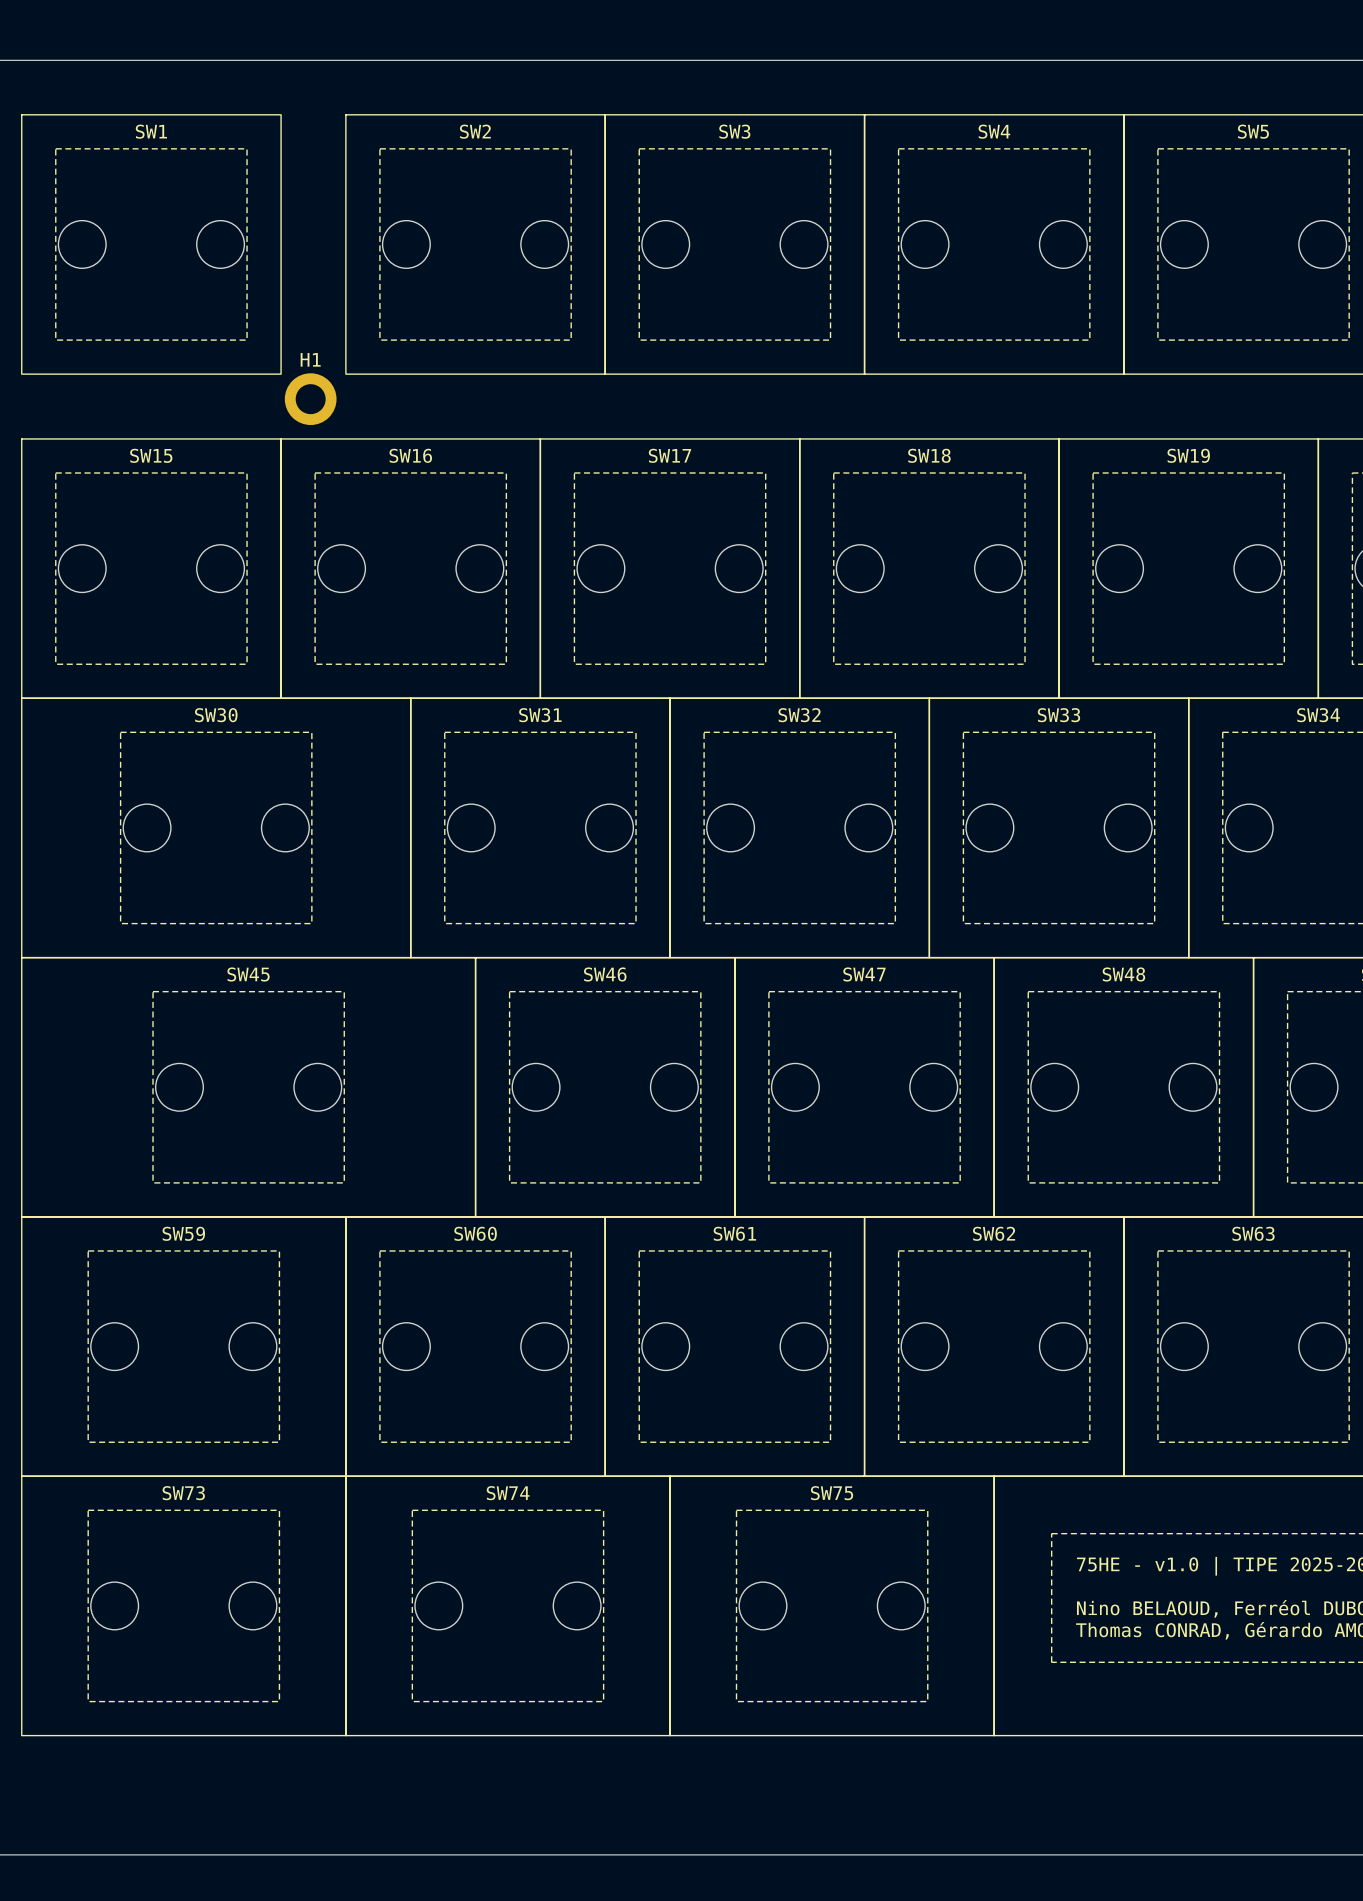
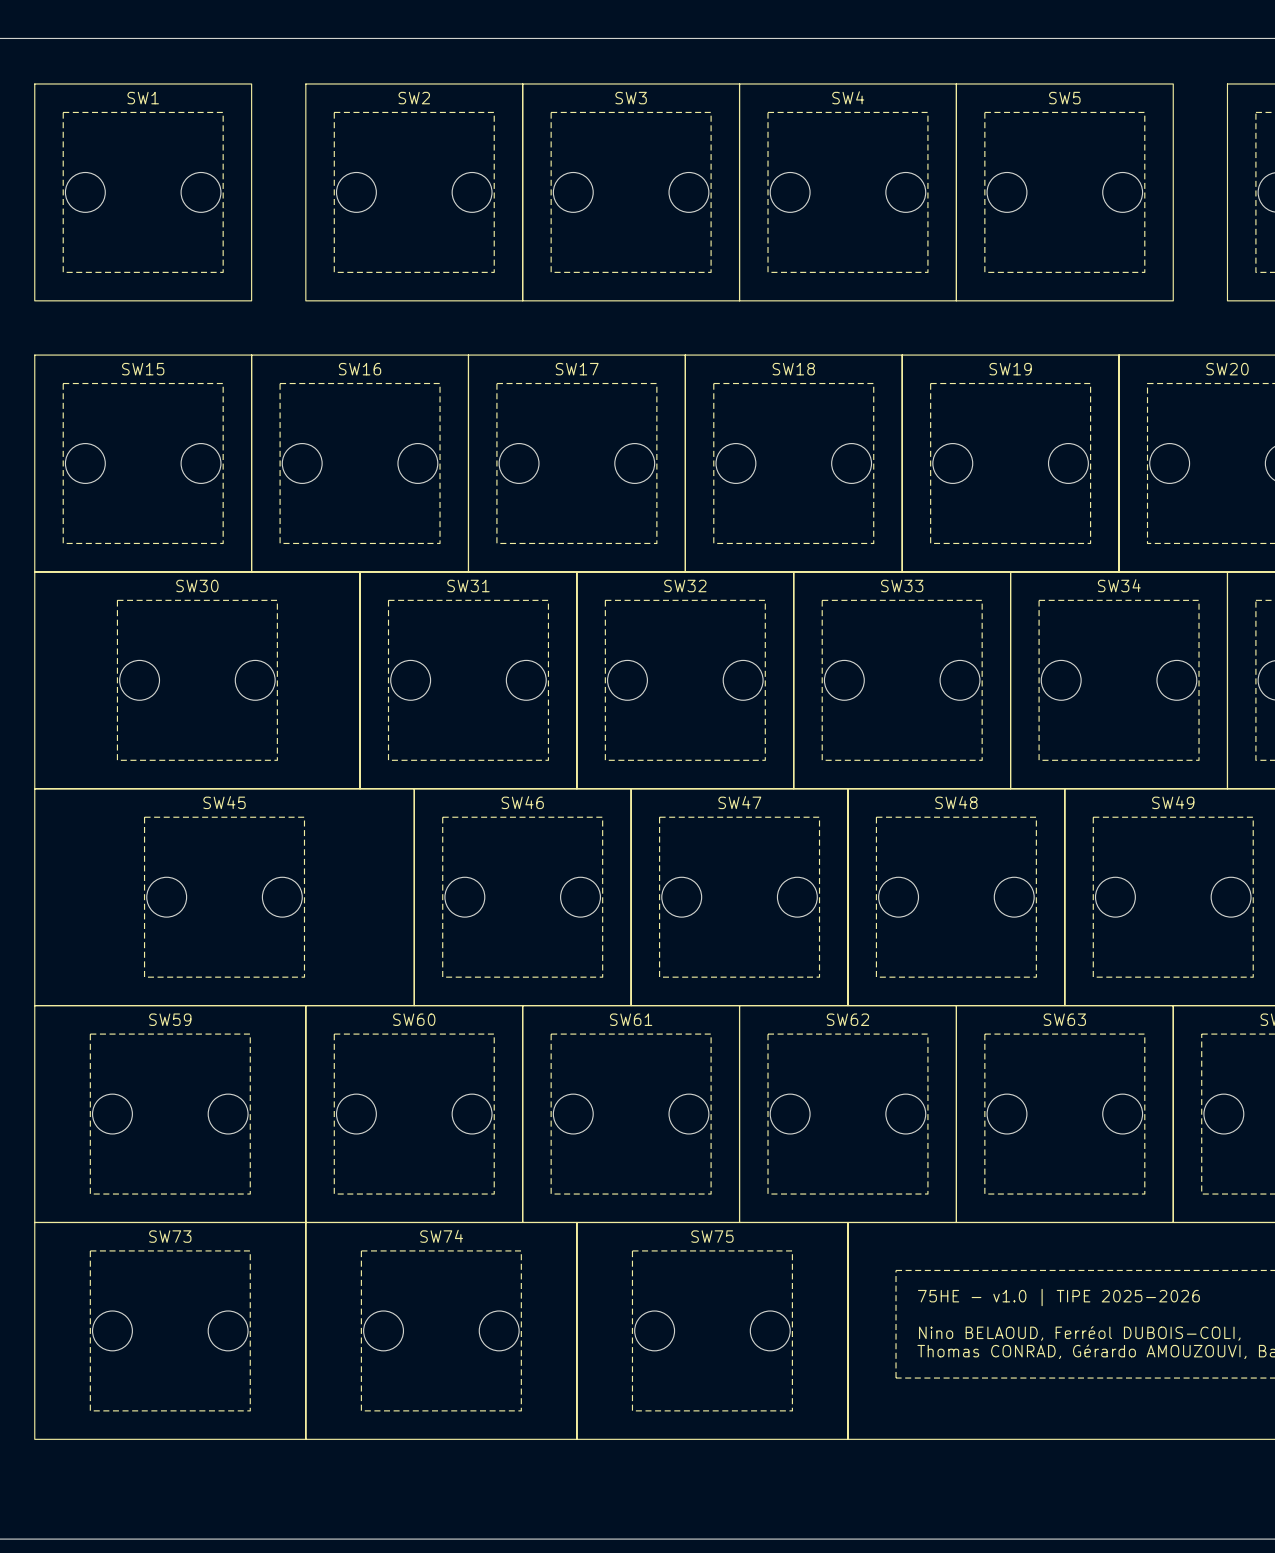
H1: (310, 399) -> none

